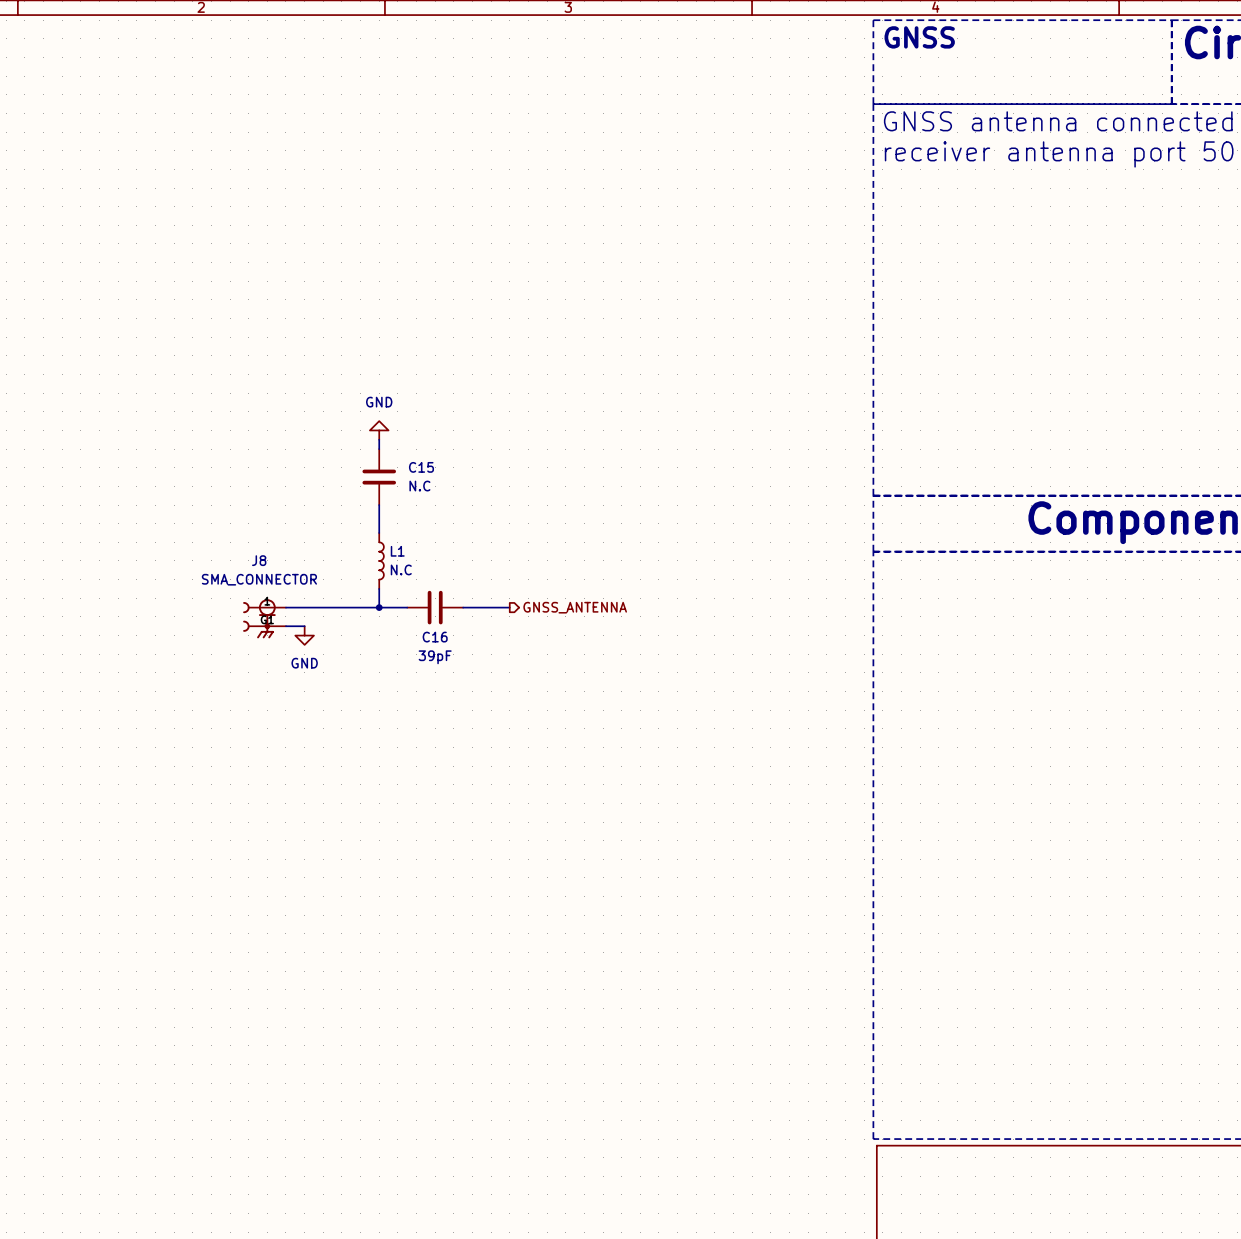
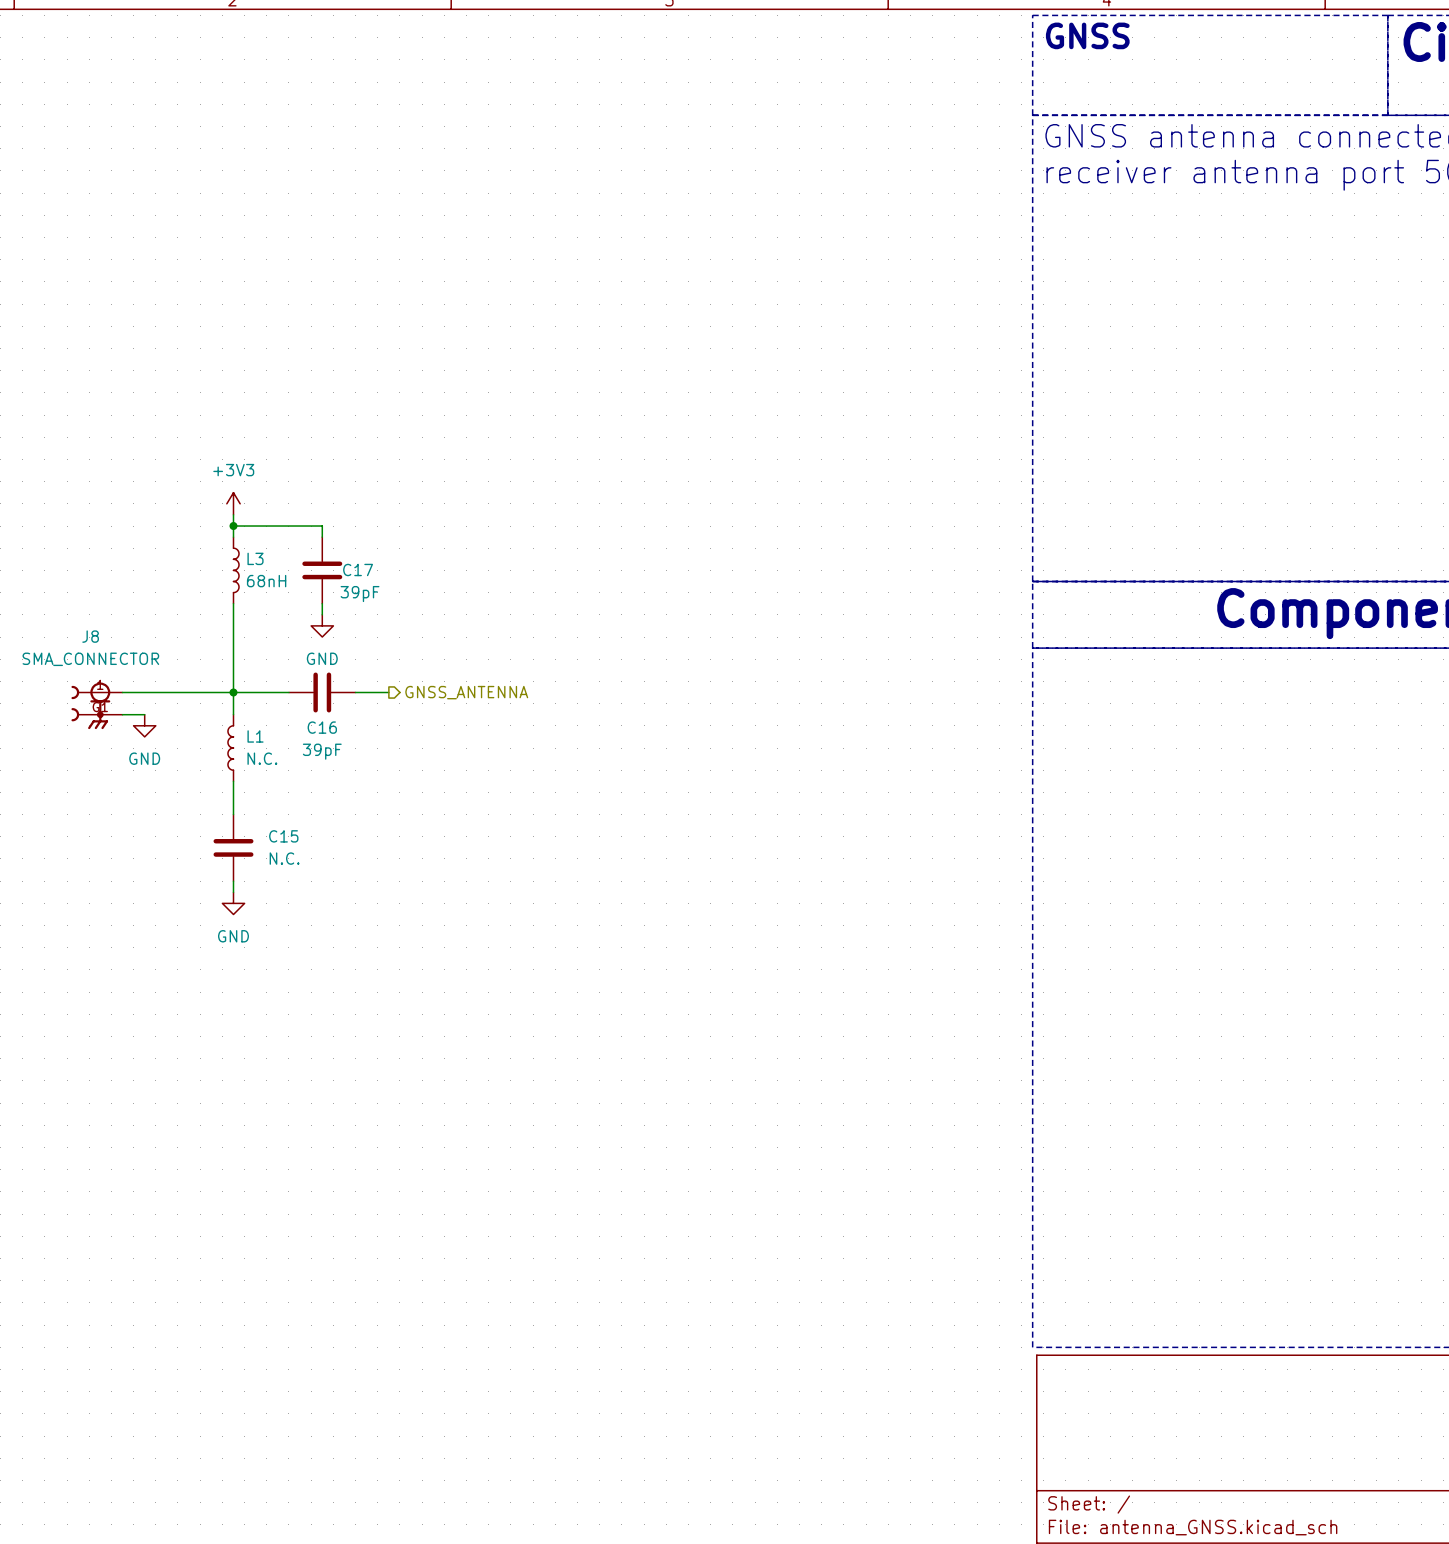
power symbol: none -> +3V3 (233, 503)
power symbol: GND (379, 430) -> none
wire: none -> (233, 514) (233, 537)
wire: (379, 439) (379, 449) -> (322, 603) (322, 614)
wire: none -> (233, 526) (322, 526) (322, 537)
junction: none -> (233, 526)
C15 position: (379, 477) -> (233, 847)
L3: none -> 68nH (236, 570)
C17: none -> 39pF (322, 570)
C15 value: N.C (419, 486) -> N.C. (284, 858)
wire: (379, 505) (379, 533) -> none
wire: none -> (233, 603) (233, 714)
power symbol: none -> GND (322, 625)
L1 rotation: 0° (381, 560) -> 180° (230, 748)
L1 position: (381, 560) -> (230, 748)
L1 value: N.C (401, 569) -> N.C. (262, 758)
wire: none -> (122, 692) (288, 692)
junction: none -> (233, 692)
wire: none -> (355, 692) (388, 692)
wire: (379, 588) (379, 607) -> none
wire: (285, 607) (407, 607) -> none
junction: (379, 607) -> none
C16 position: (435, 607) -> (322, 692)
wire: (463, 607) (509, 607) -> none
hierarchical label position: GNSS_ANTENNA (575, 607) -> GNSS_ANTENNA (466, 692)
power symbol: none -> GND (144, 725)
J8 position: (264, 618) -> (96, 705)
wire: (285, 626) (304, 626) -> (122, 714) (144, 714)
power symbol: GND (304, 635) -> none
wire: none -> (233, 781) (233, 814)
wire: none -> (233, 881) (233, 892)
power symbol: none -> GND (233, 903)

